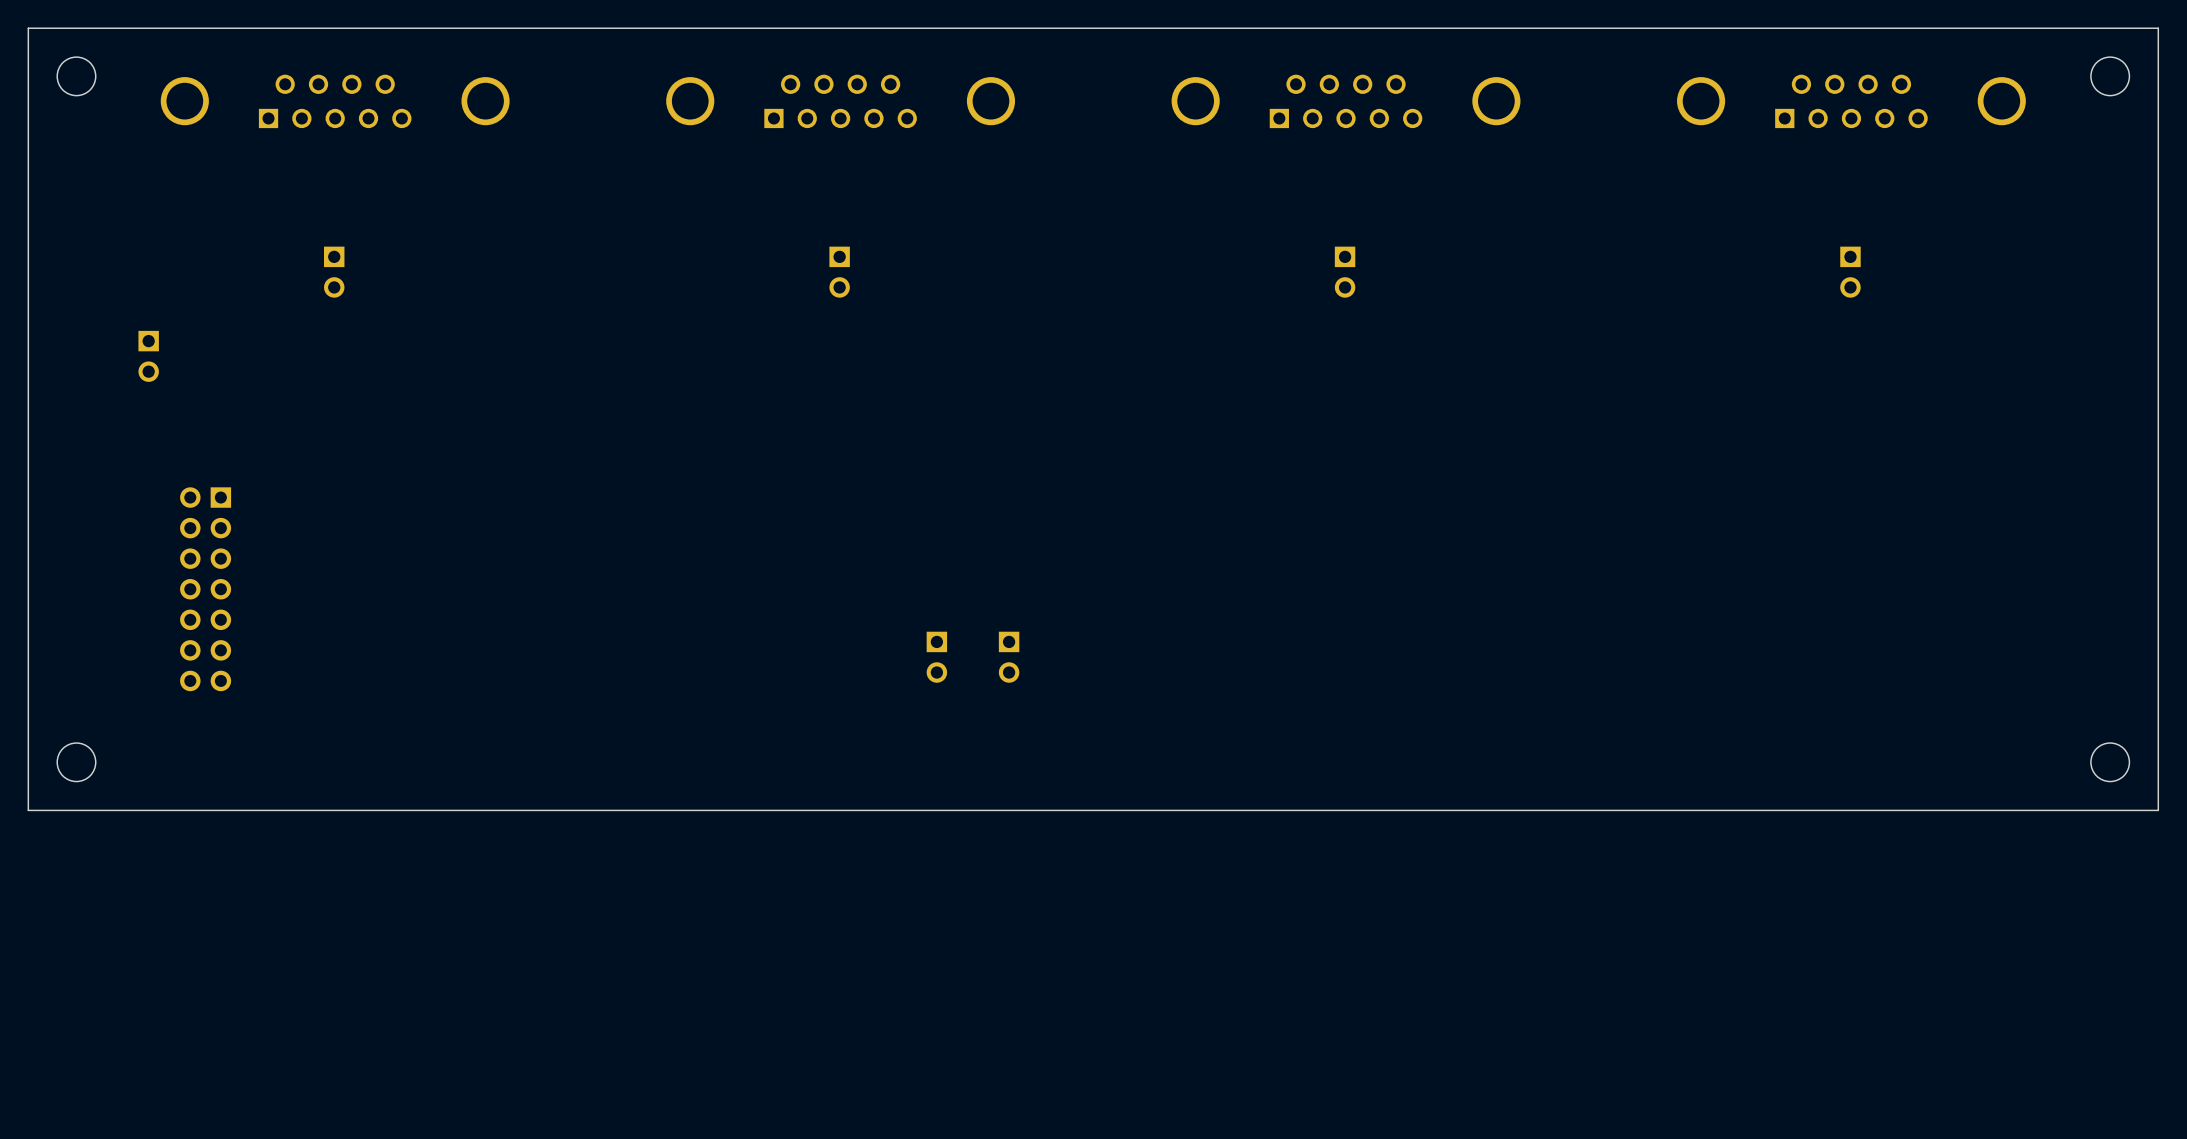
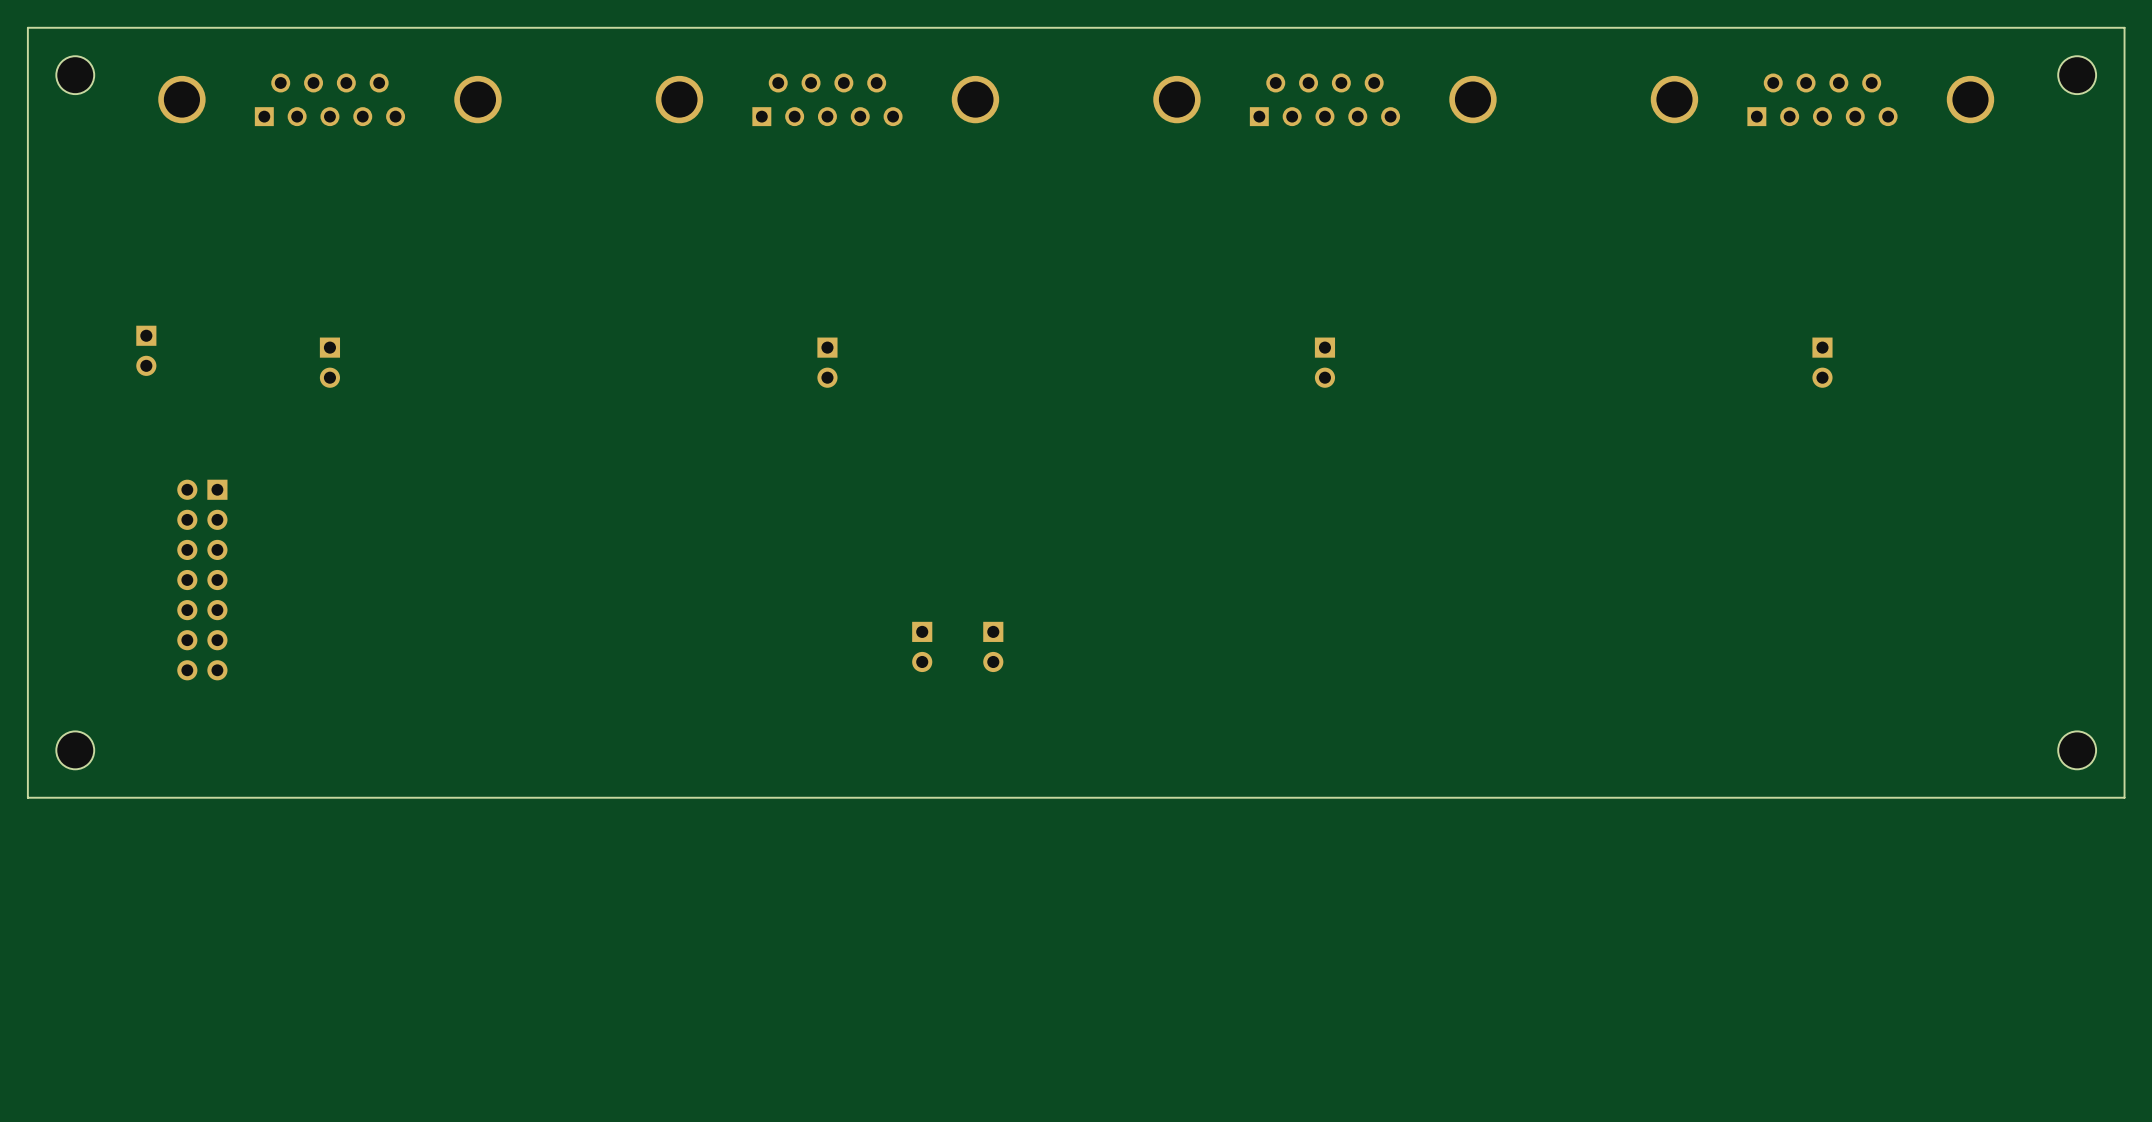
part position: (334, 272) -> (329, 362)
part position: (839, 272) -> (827, 362)
part position: (1345, 272) -> (1324, 362)
part position: (1850, 272) -> (1822, 362)

